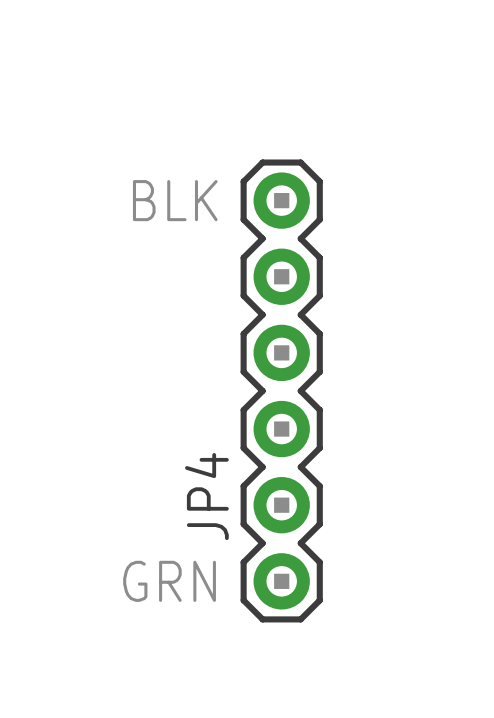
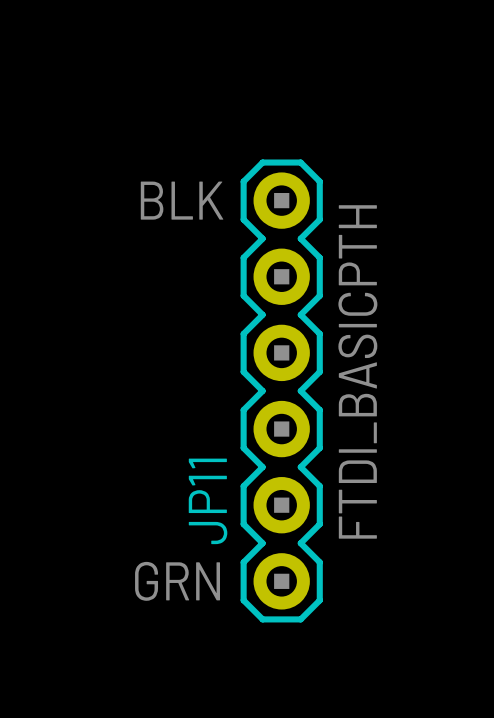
JP4 value: none -> FTDI_BASICPTH (357, 371)
JP4 name: JP4 (206, 496) -> JP11 (208, 501)

